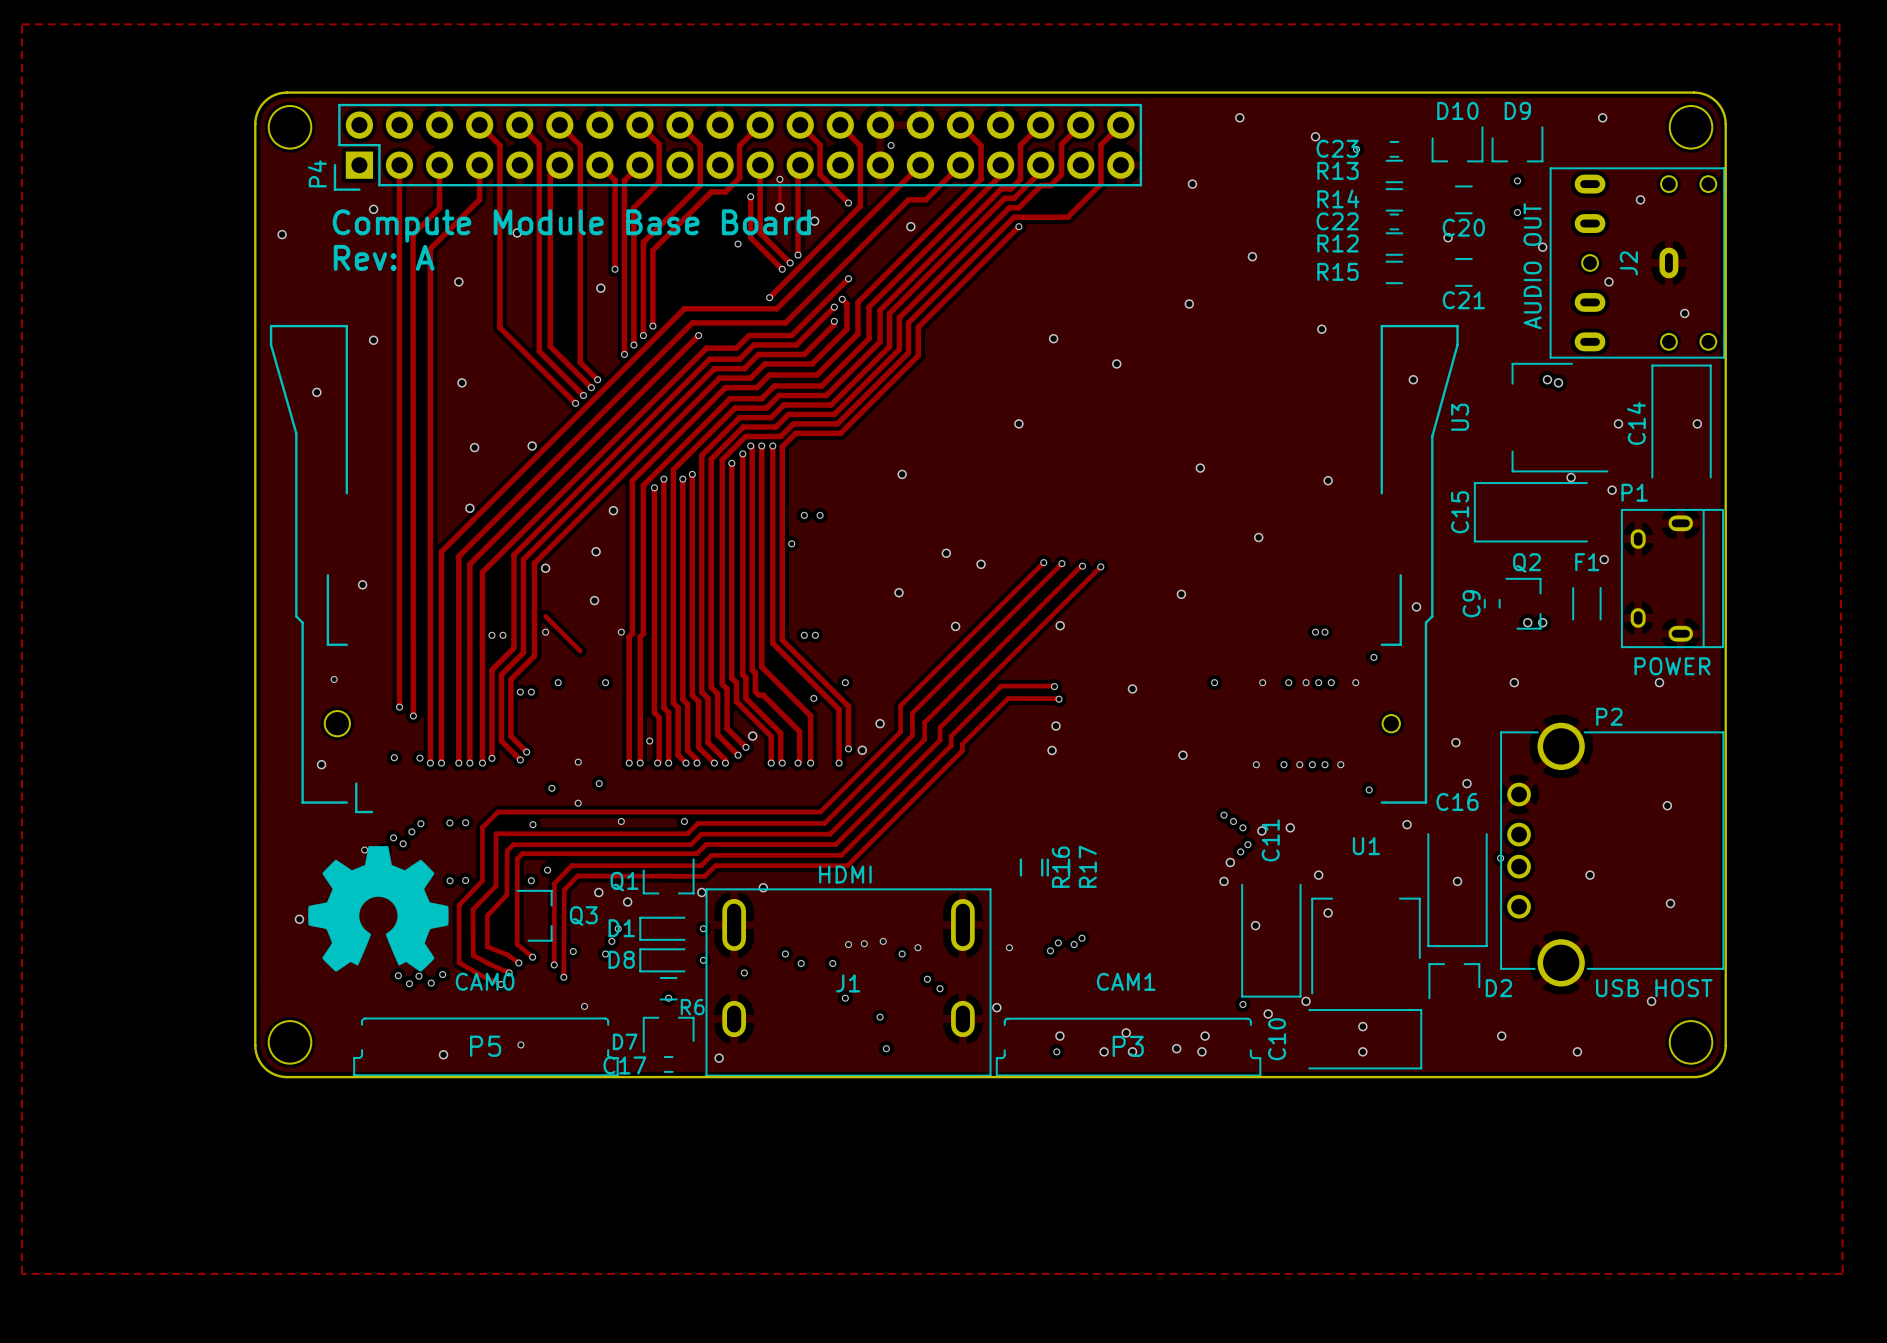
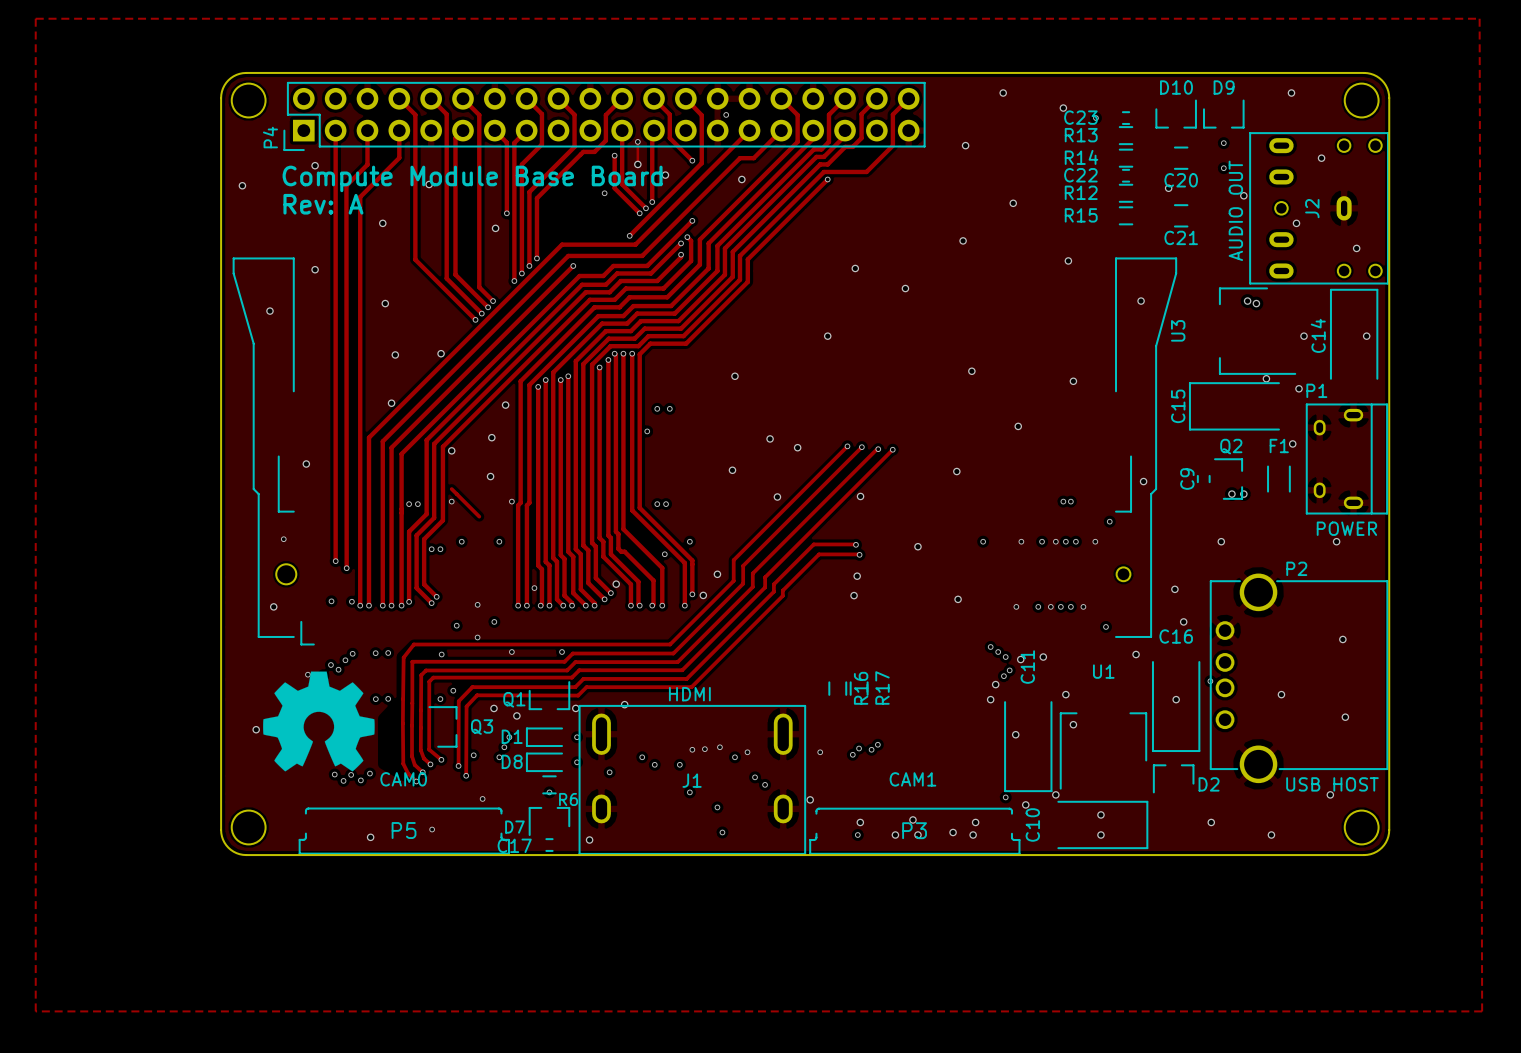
track: (497, 812) (482, 827) (482, 880) (459, 905) (459, 962) (501, 984) -> (413, 644) (403, 657) (403, 763) (408, 773) (416, 781)
track: (496, 886) (473, 909) (473, 955) (509, 972) -> (412, 703) (412, 756) (414, 764) (422, 772)
track: (506, 894) (487, 915) (487, 946) (507, 954) (518, 962) -> (420, 710) (420, 750) (423, 758) (430, 764)

